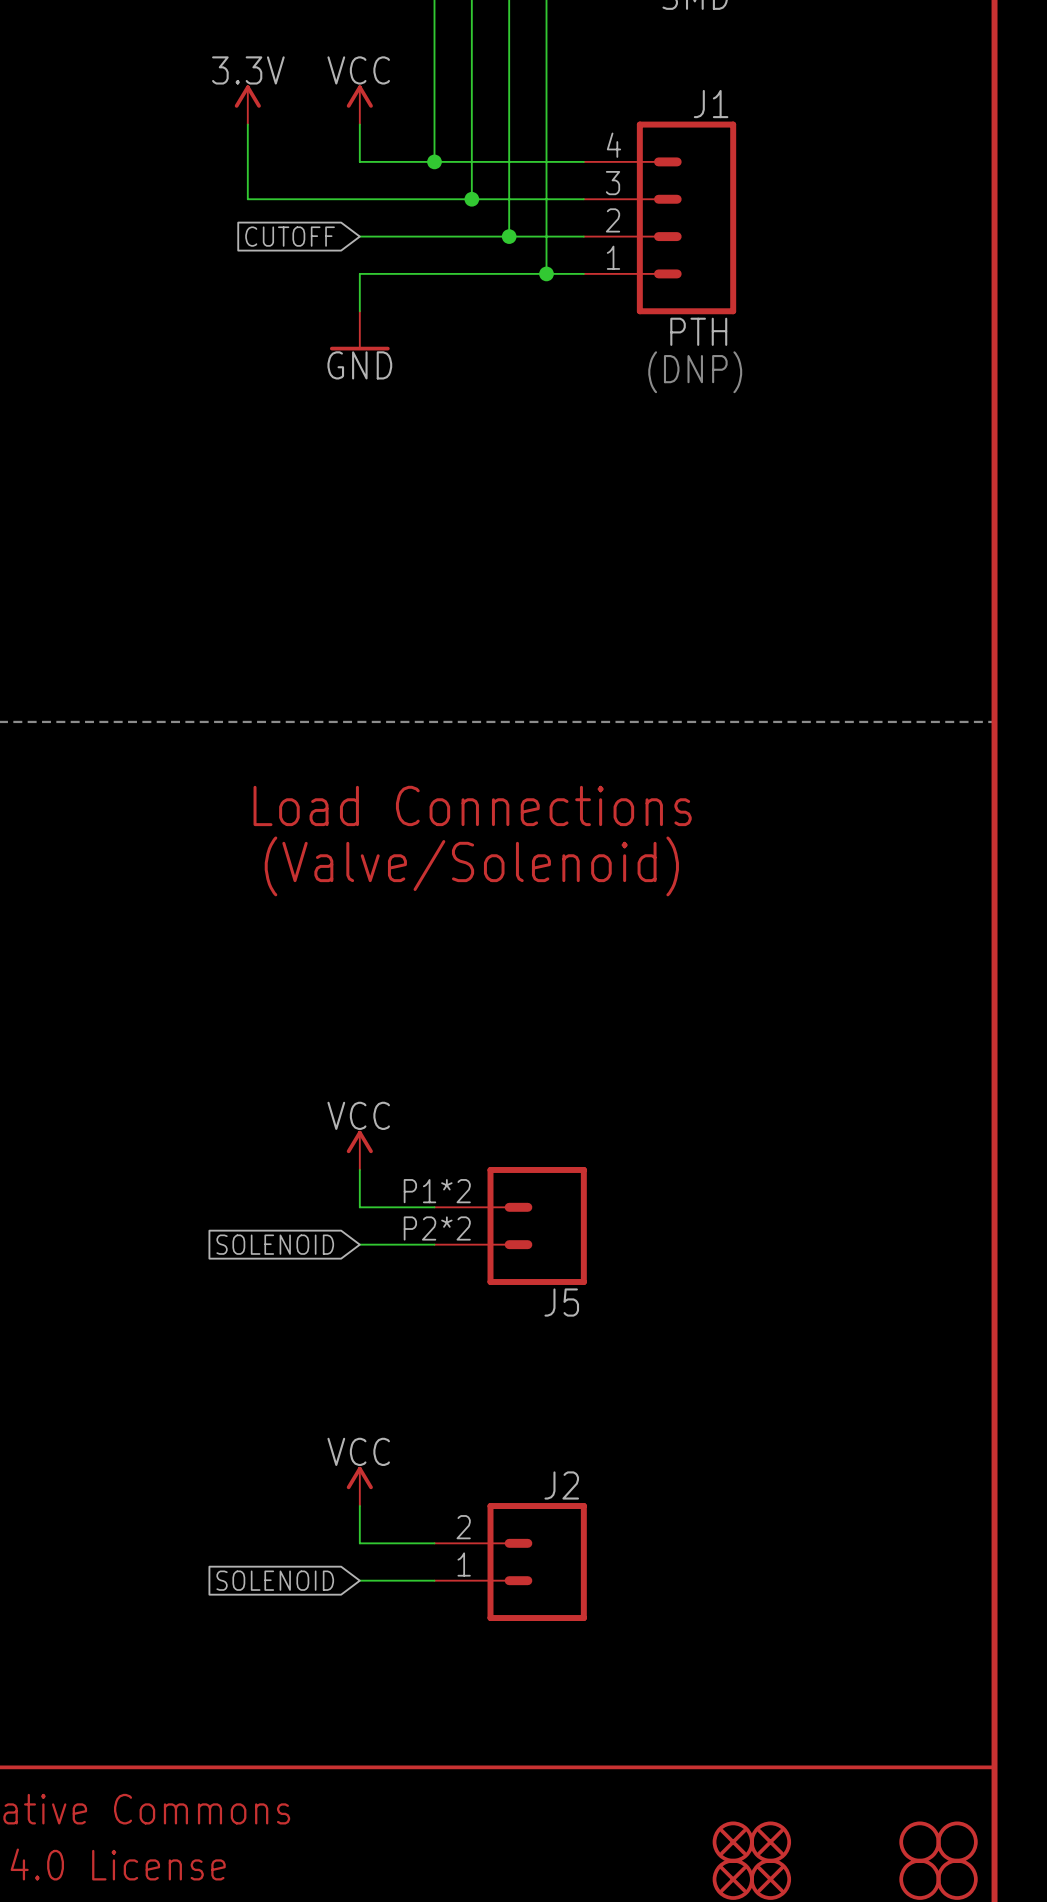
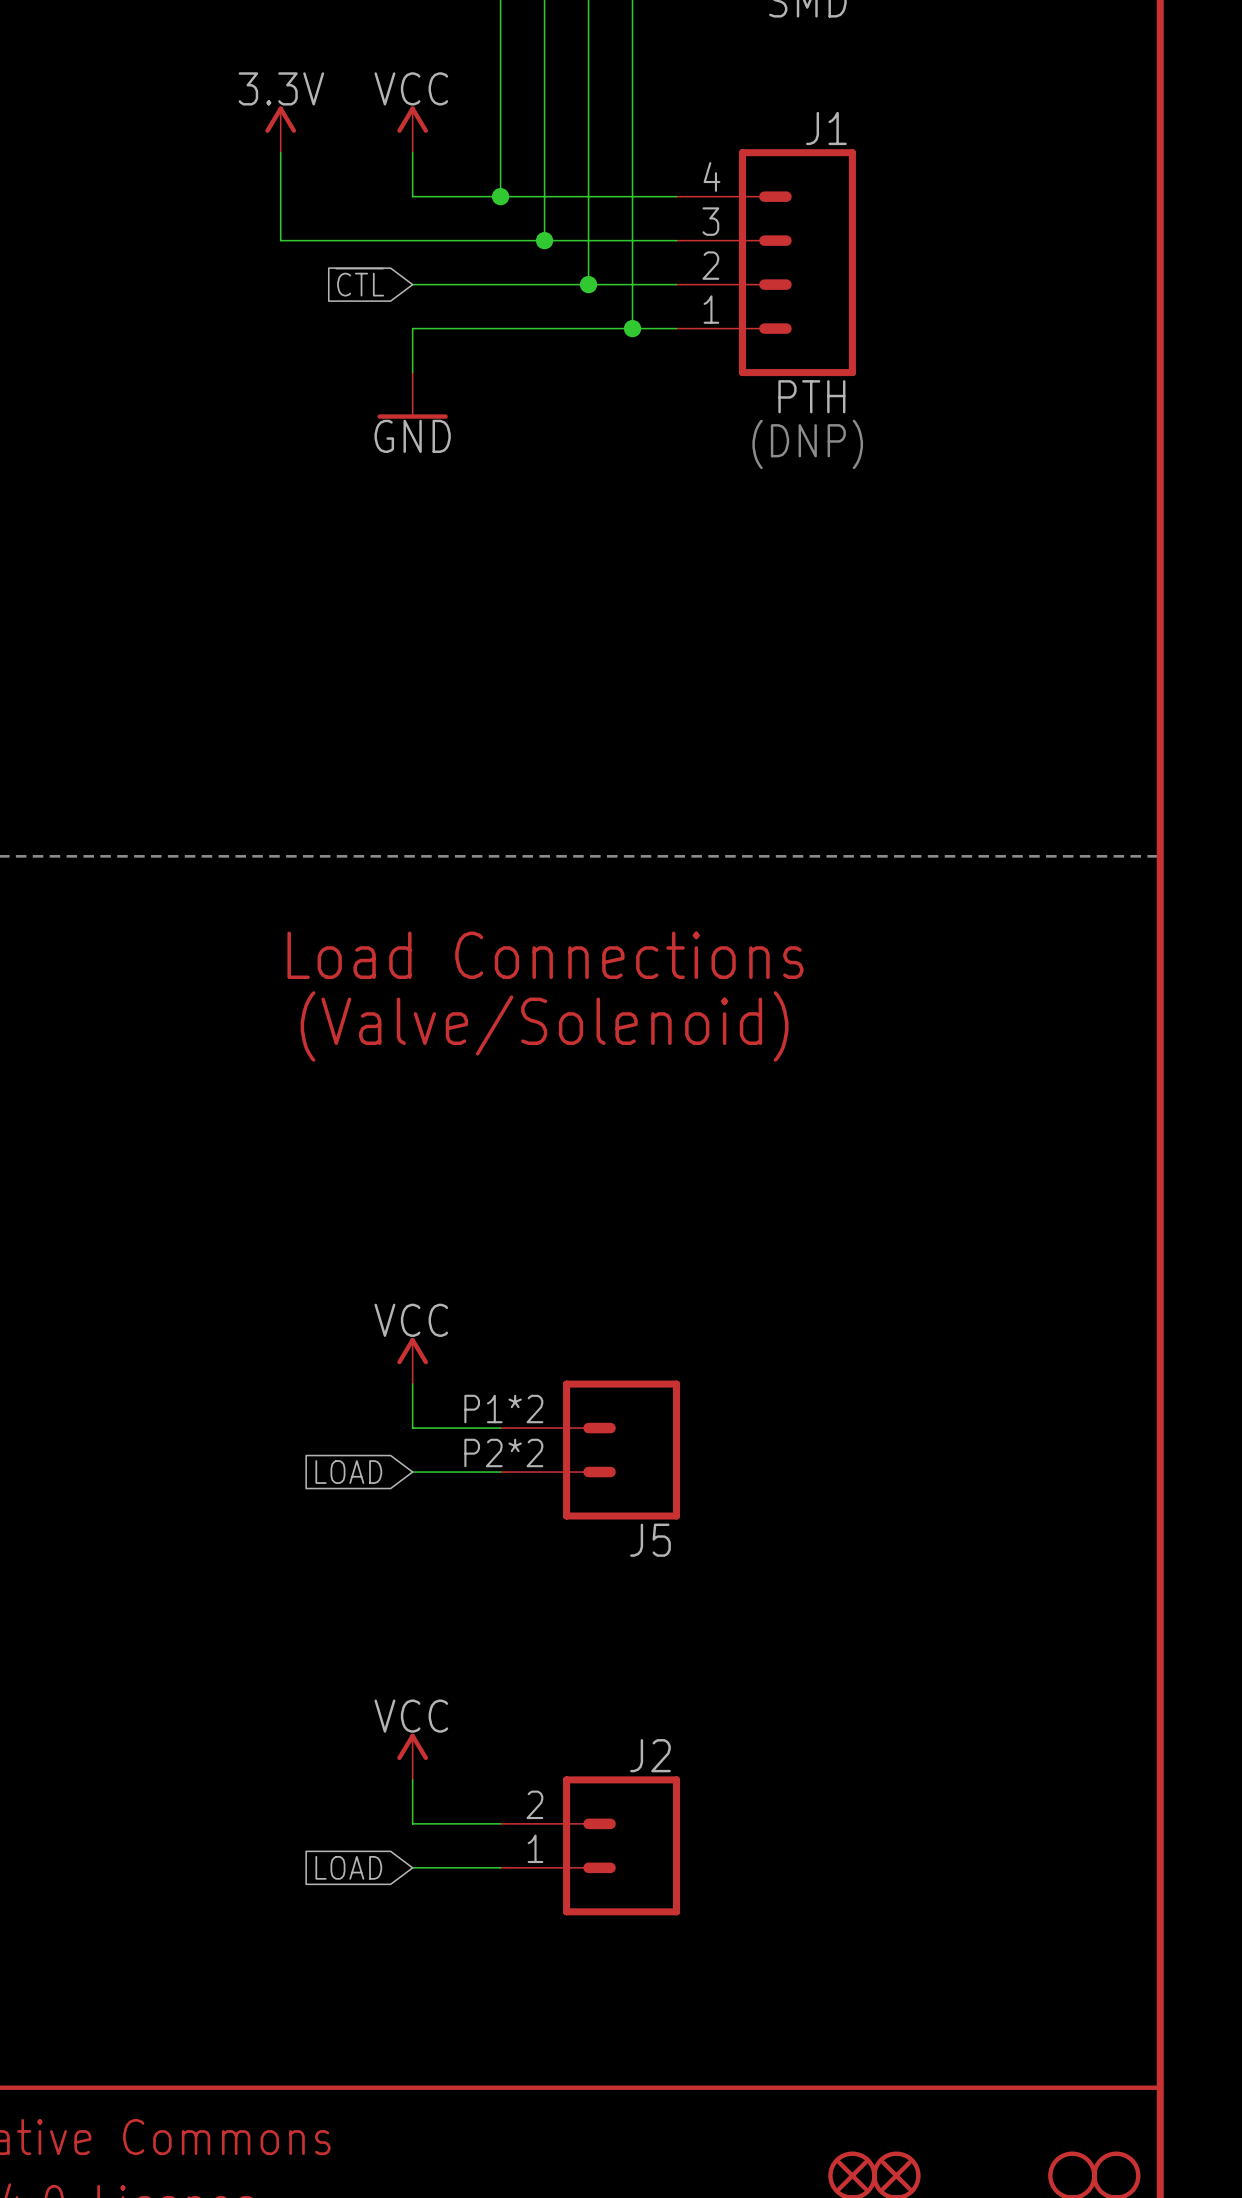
global label: CUTOFF (290, 236) -> ~{CTL} (359, 282)
global label: SOLENOID (275, 1244) -> LOAD (348, 1472)
global label: SOLENOID (275, 1580) -> LOAD (348, 1867)

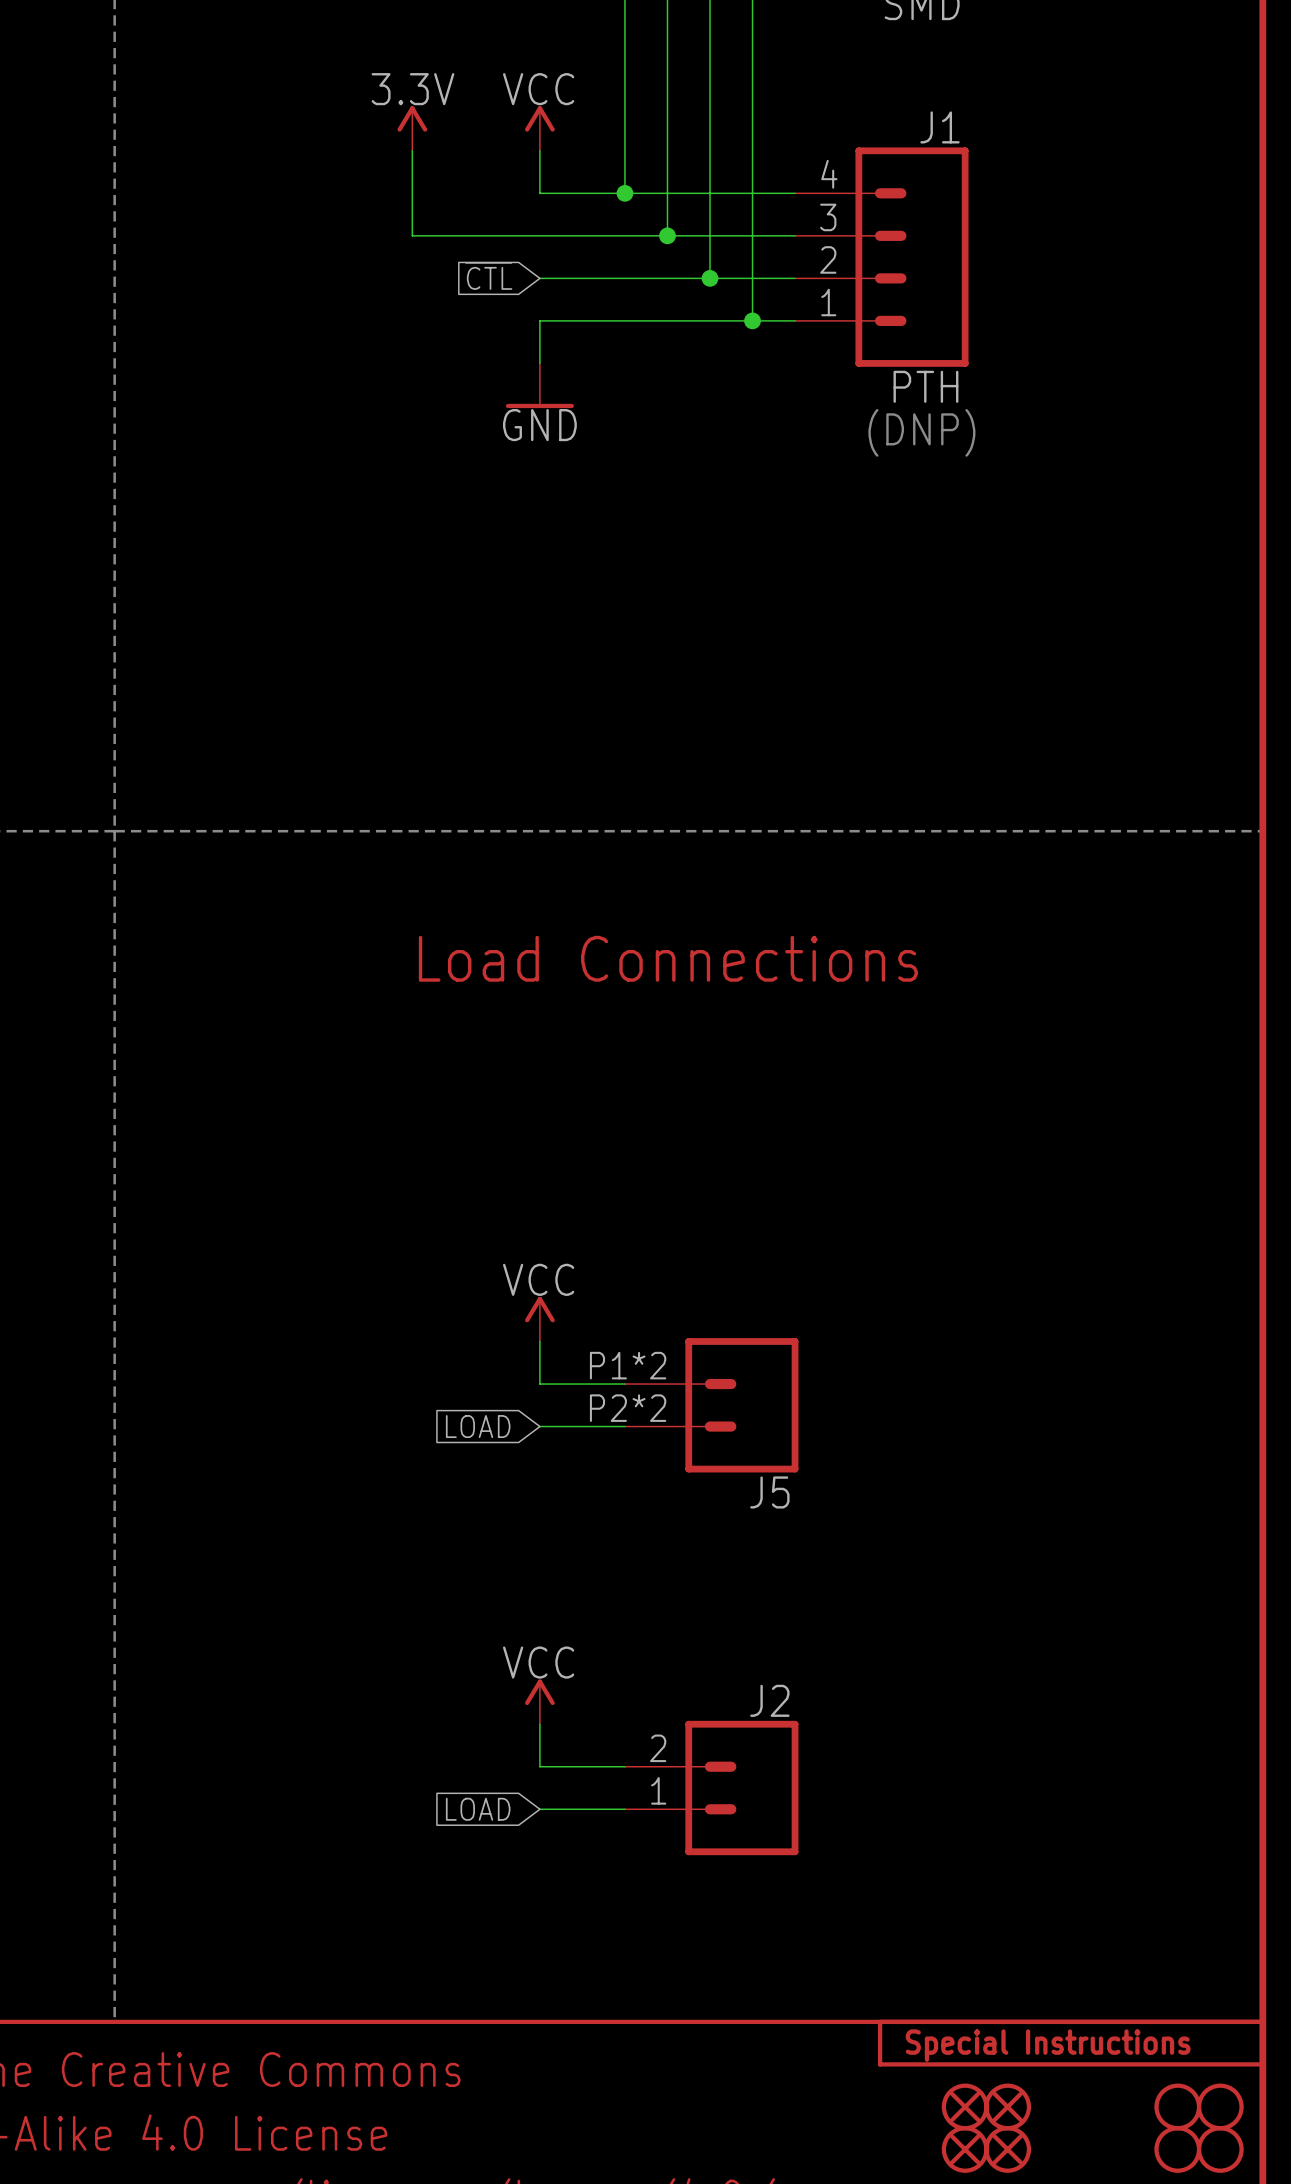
text position: Load Connections (545, 955) -> Load Connections (668, 958)
text: (Valve/Solenoid) (544, 1026) -> none
part: none -> (1071, 2043)

